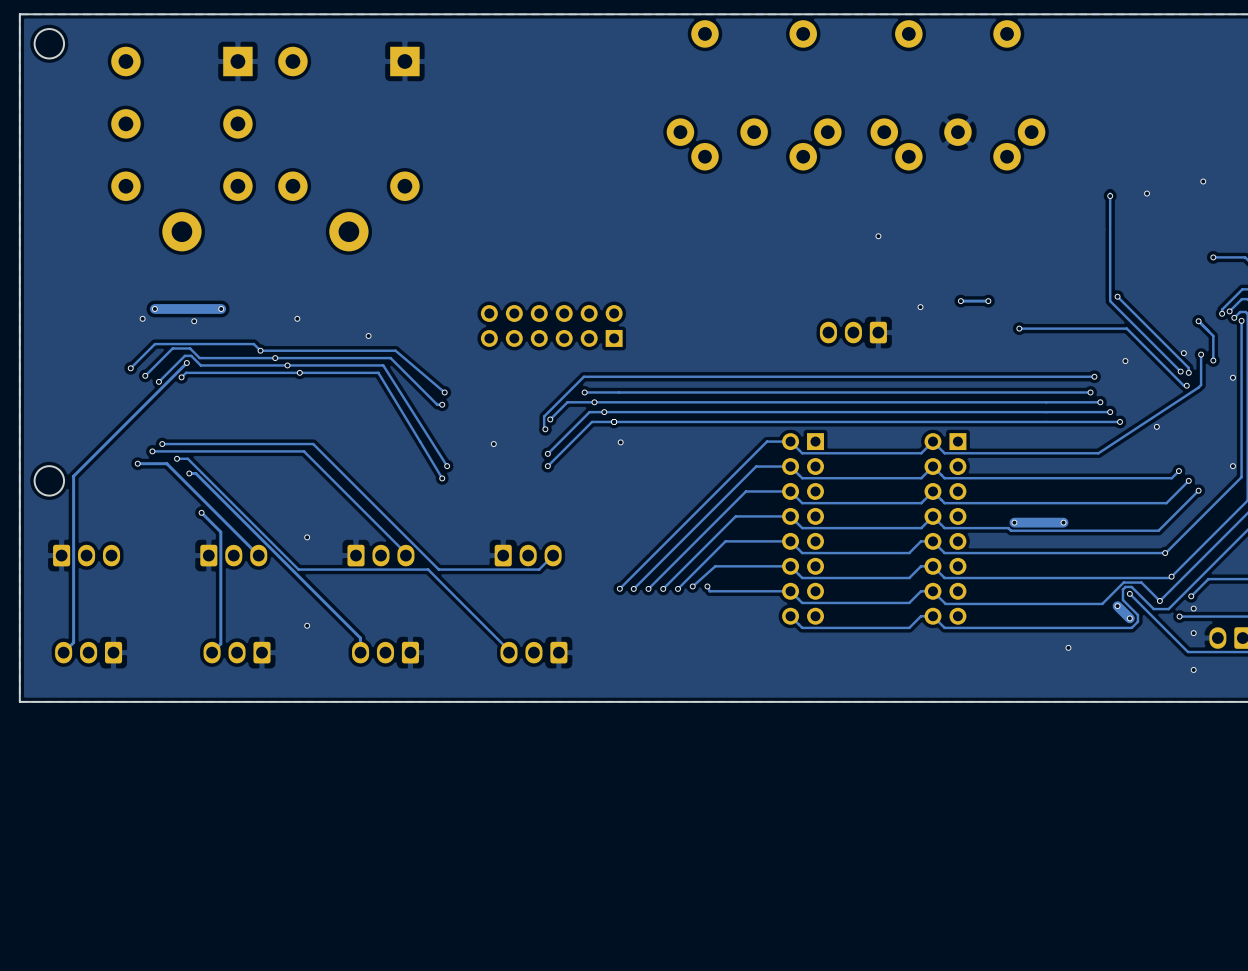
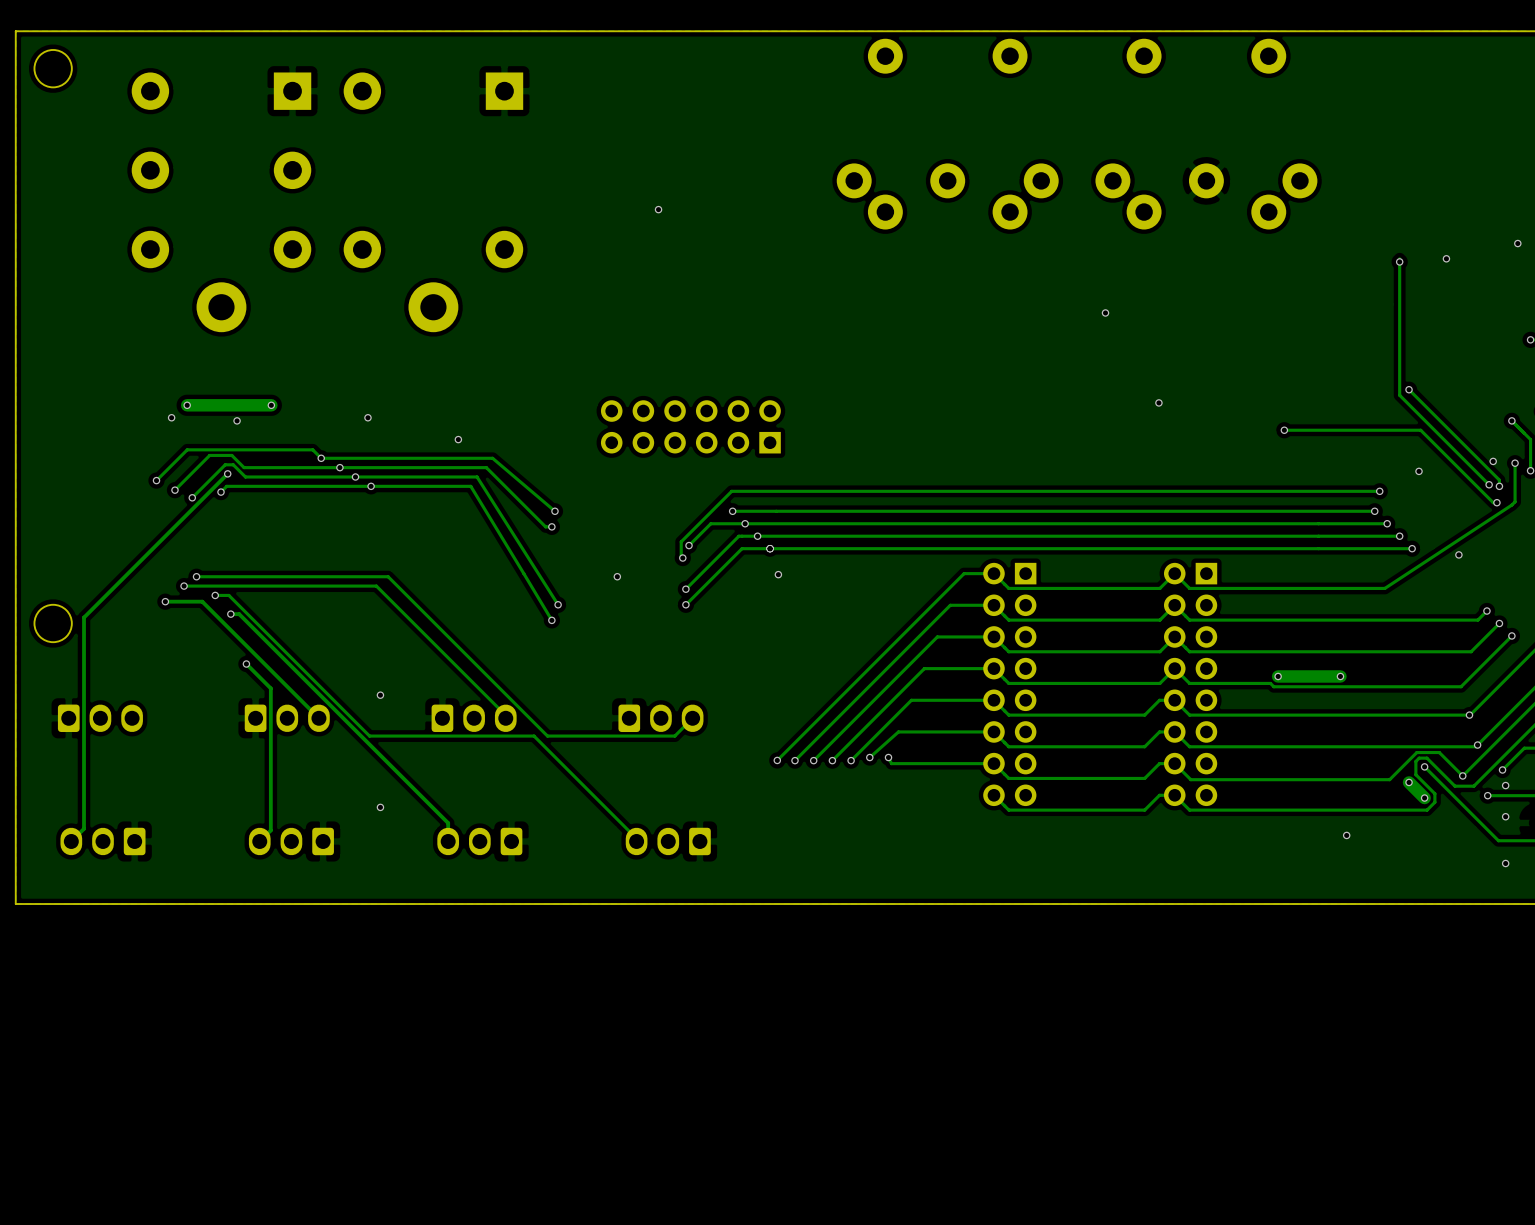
via: none -> (658, 209)
via: (960, 301) -> none
track: (988, 301) (960, 301) -> none
via: (988, 301) -> none
part: (853, 332) -> none

